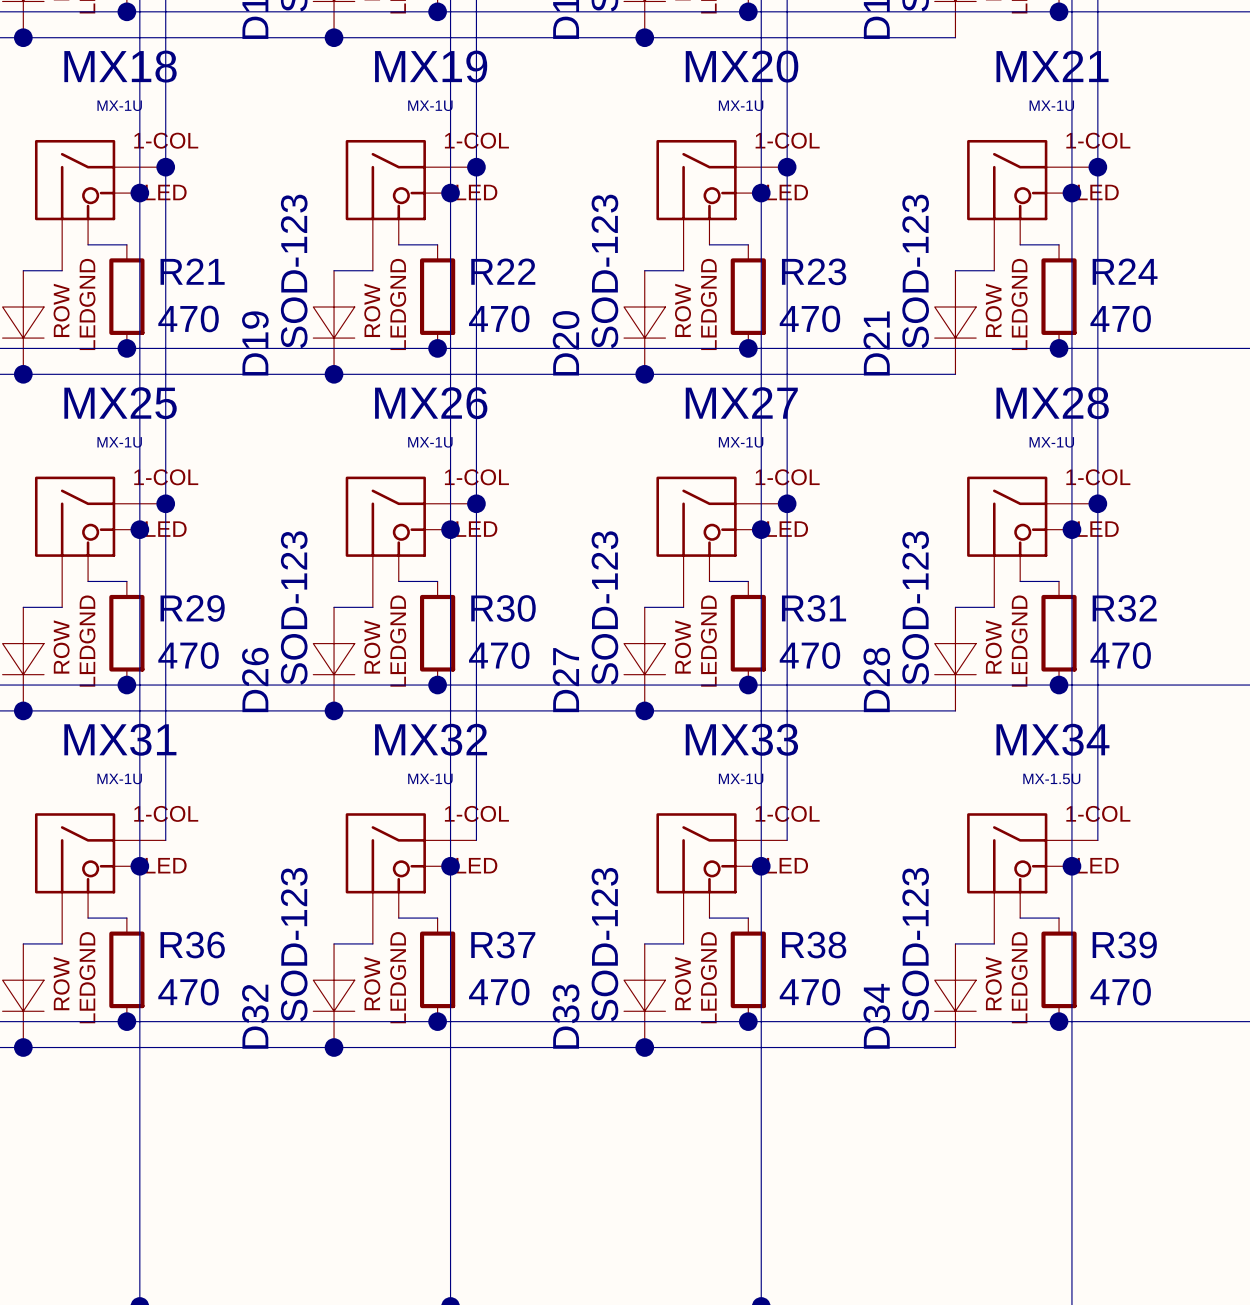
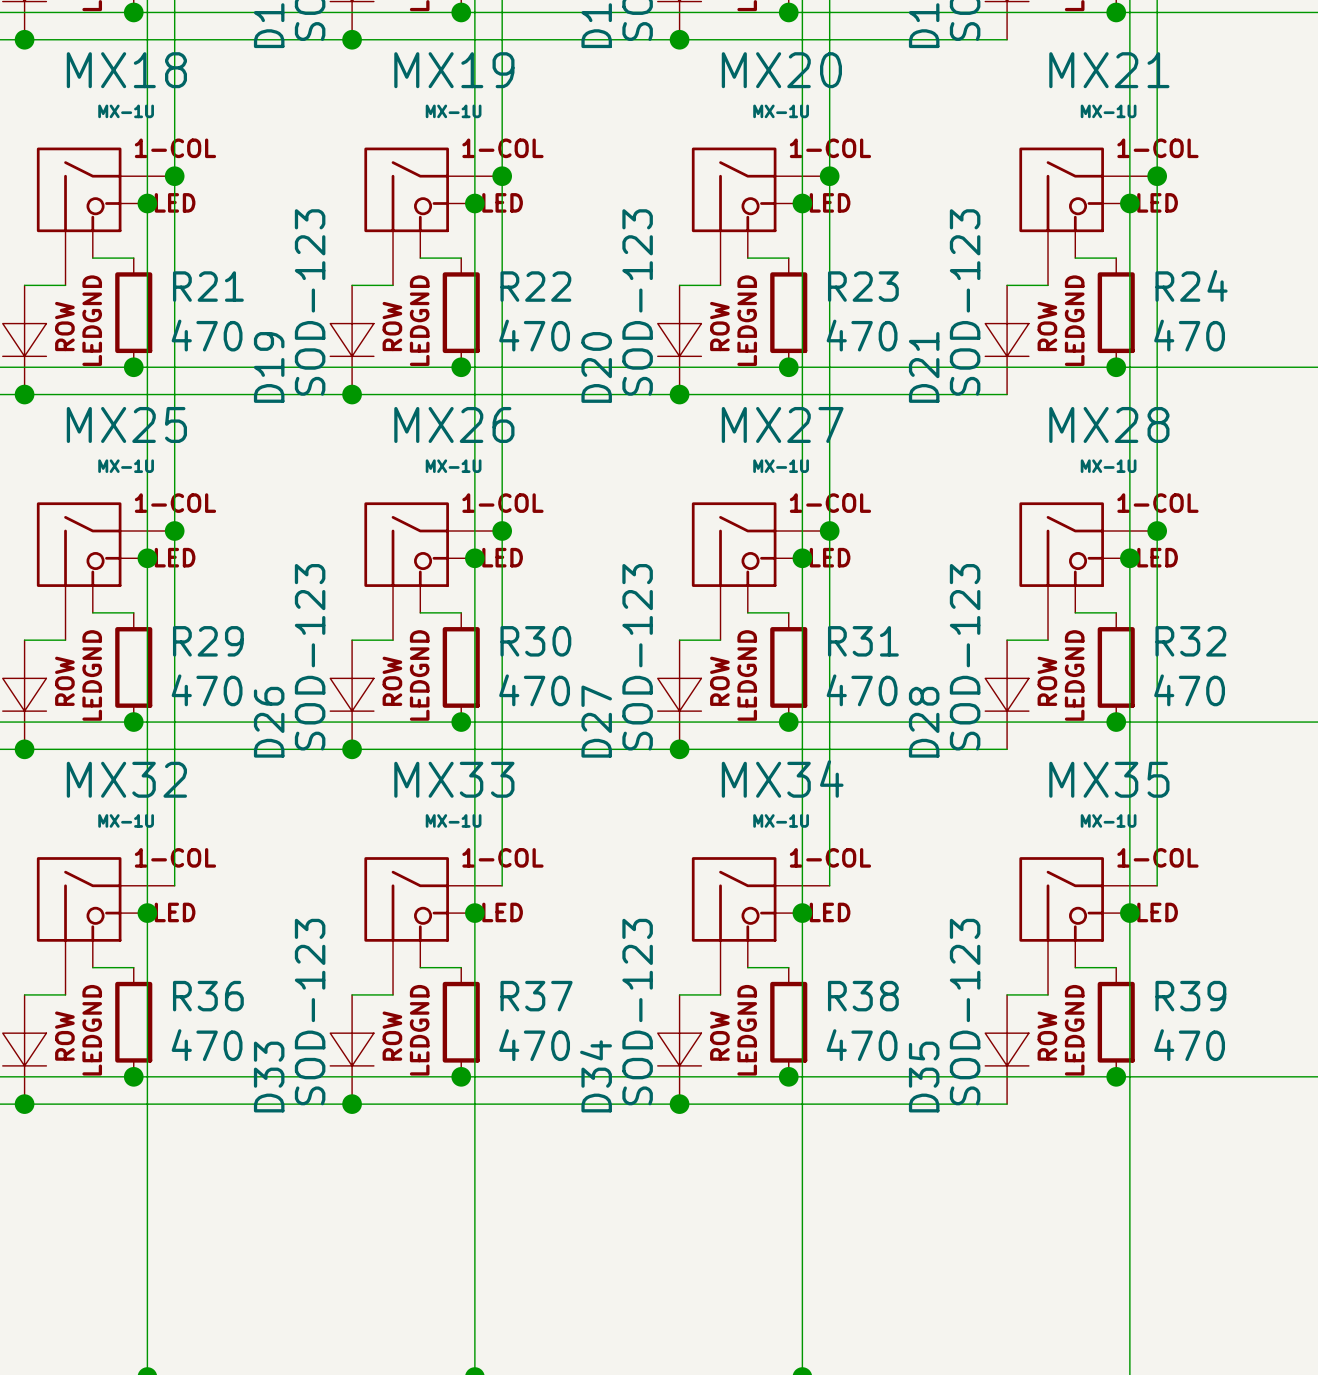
MX31 name: MX31 (120, 739) -> MX32 (126, 779)
MX32 name: MX32 (431, 739) -> MX33 (454, 779)
MX33 name: MX33 (741, 739) -> MX34 (782, 778)
MX34 name: MX34 (1052, 739) -> MX35 (1109, 779)
MX34 value: MX-1.5U (1051, 778) -> MX-1U (1108, 820)
D32 name: D32 (255, 1016) -> D33 (269, 1077)
D33 name: D33 (566, 1016) -> D34 (596, 1076)
D34 name: D34 (876, 1016) -> D35 (924, 1077)

